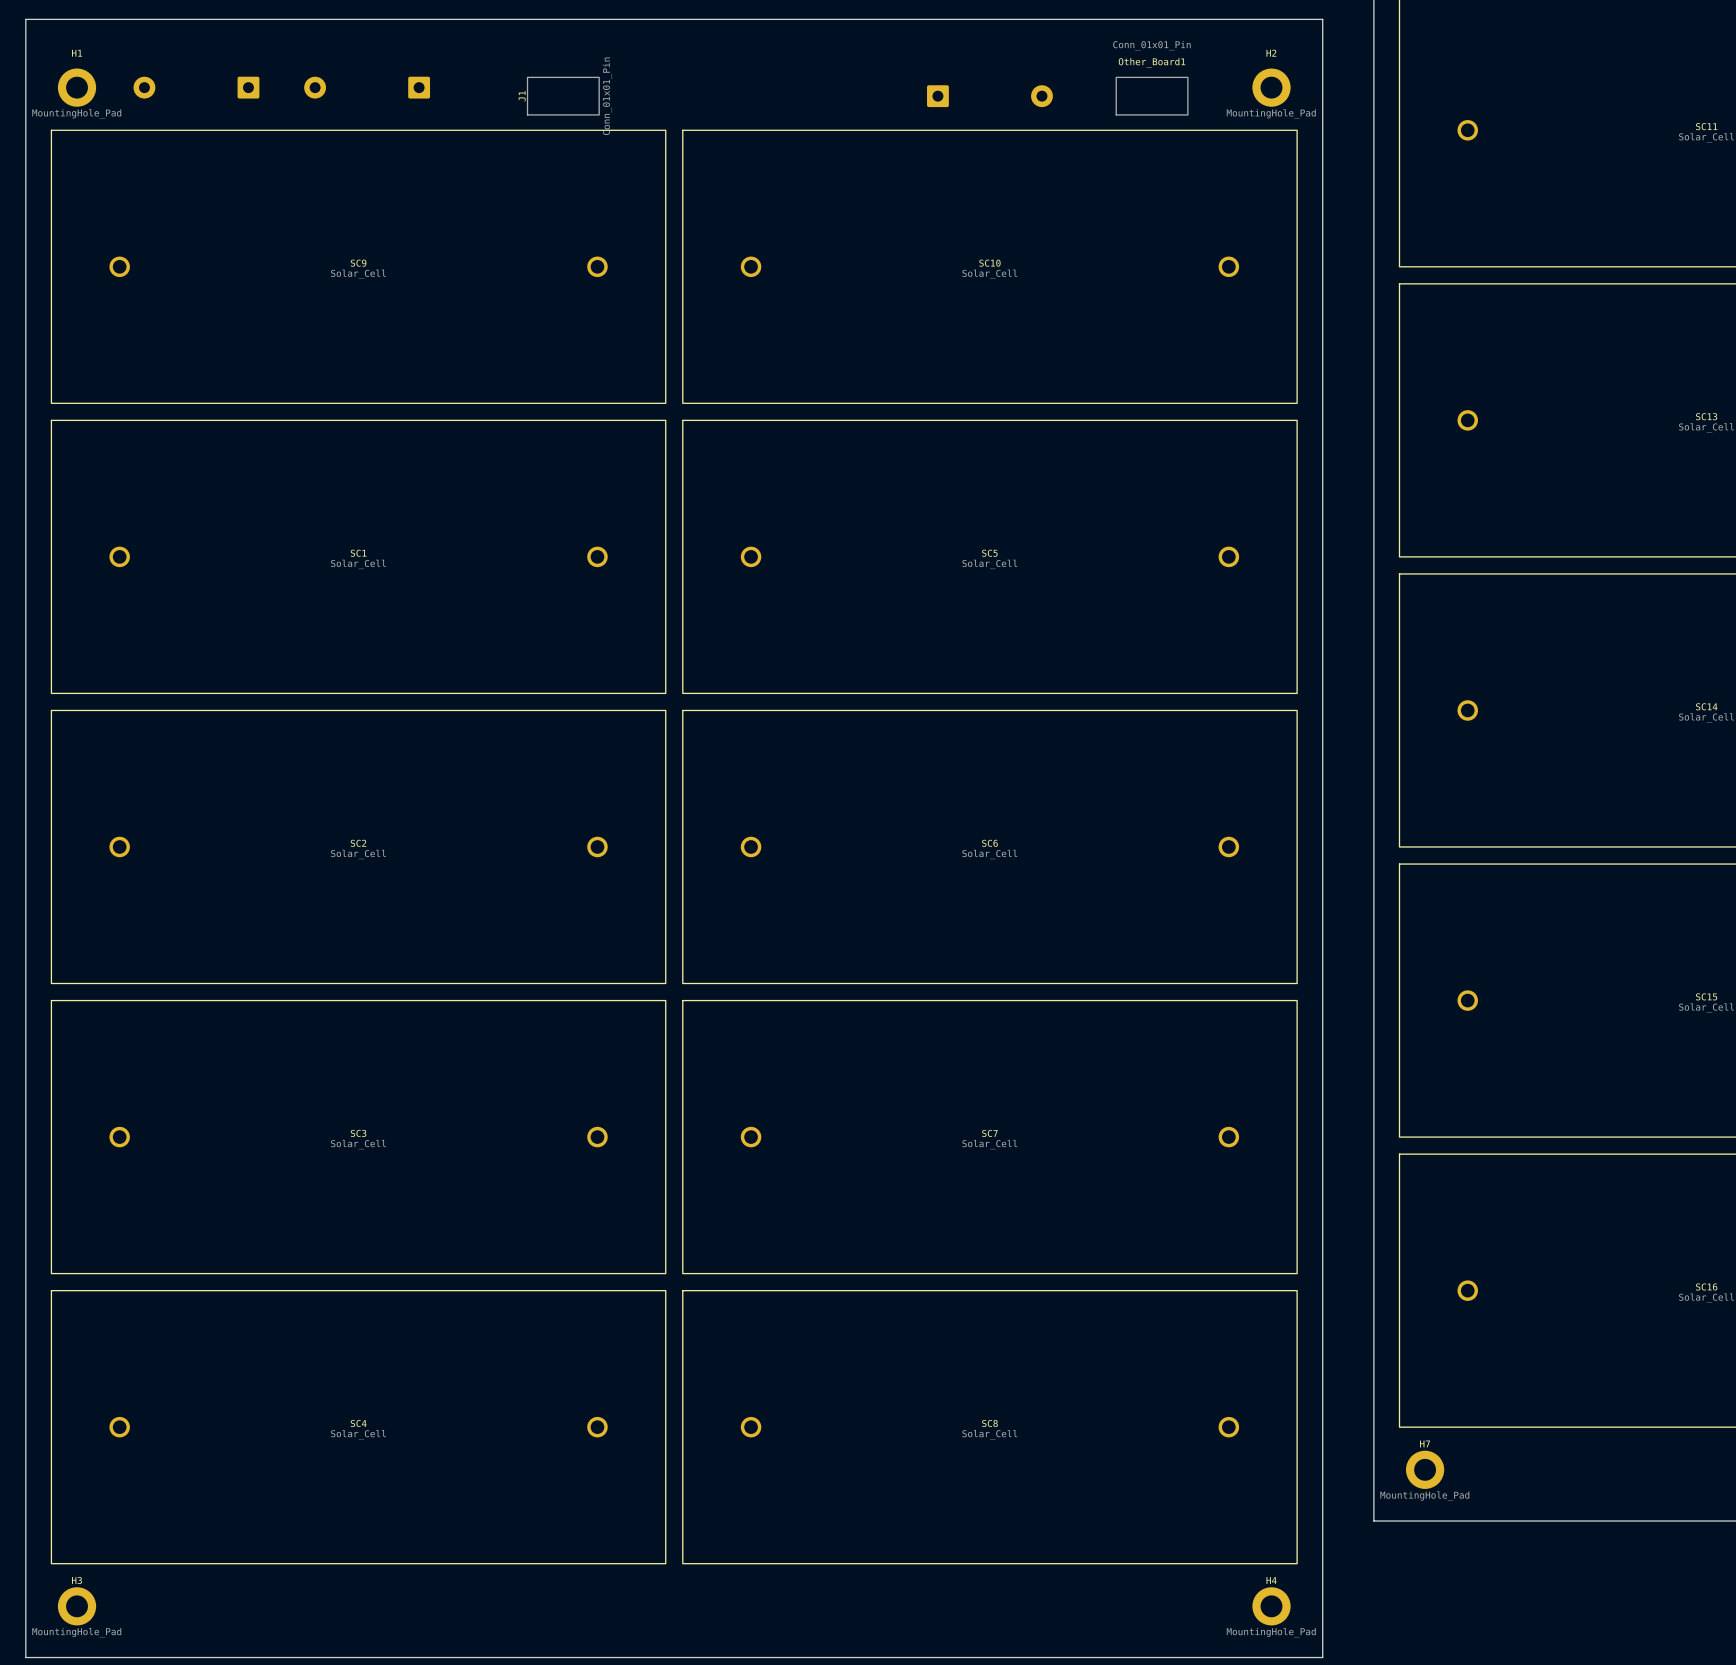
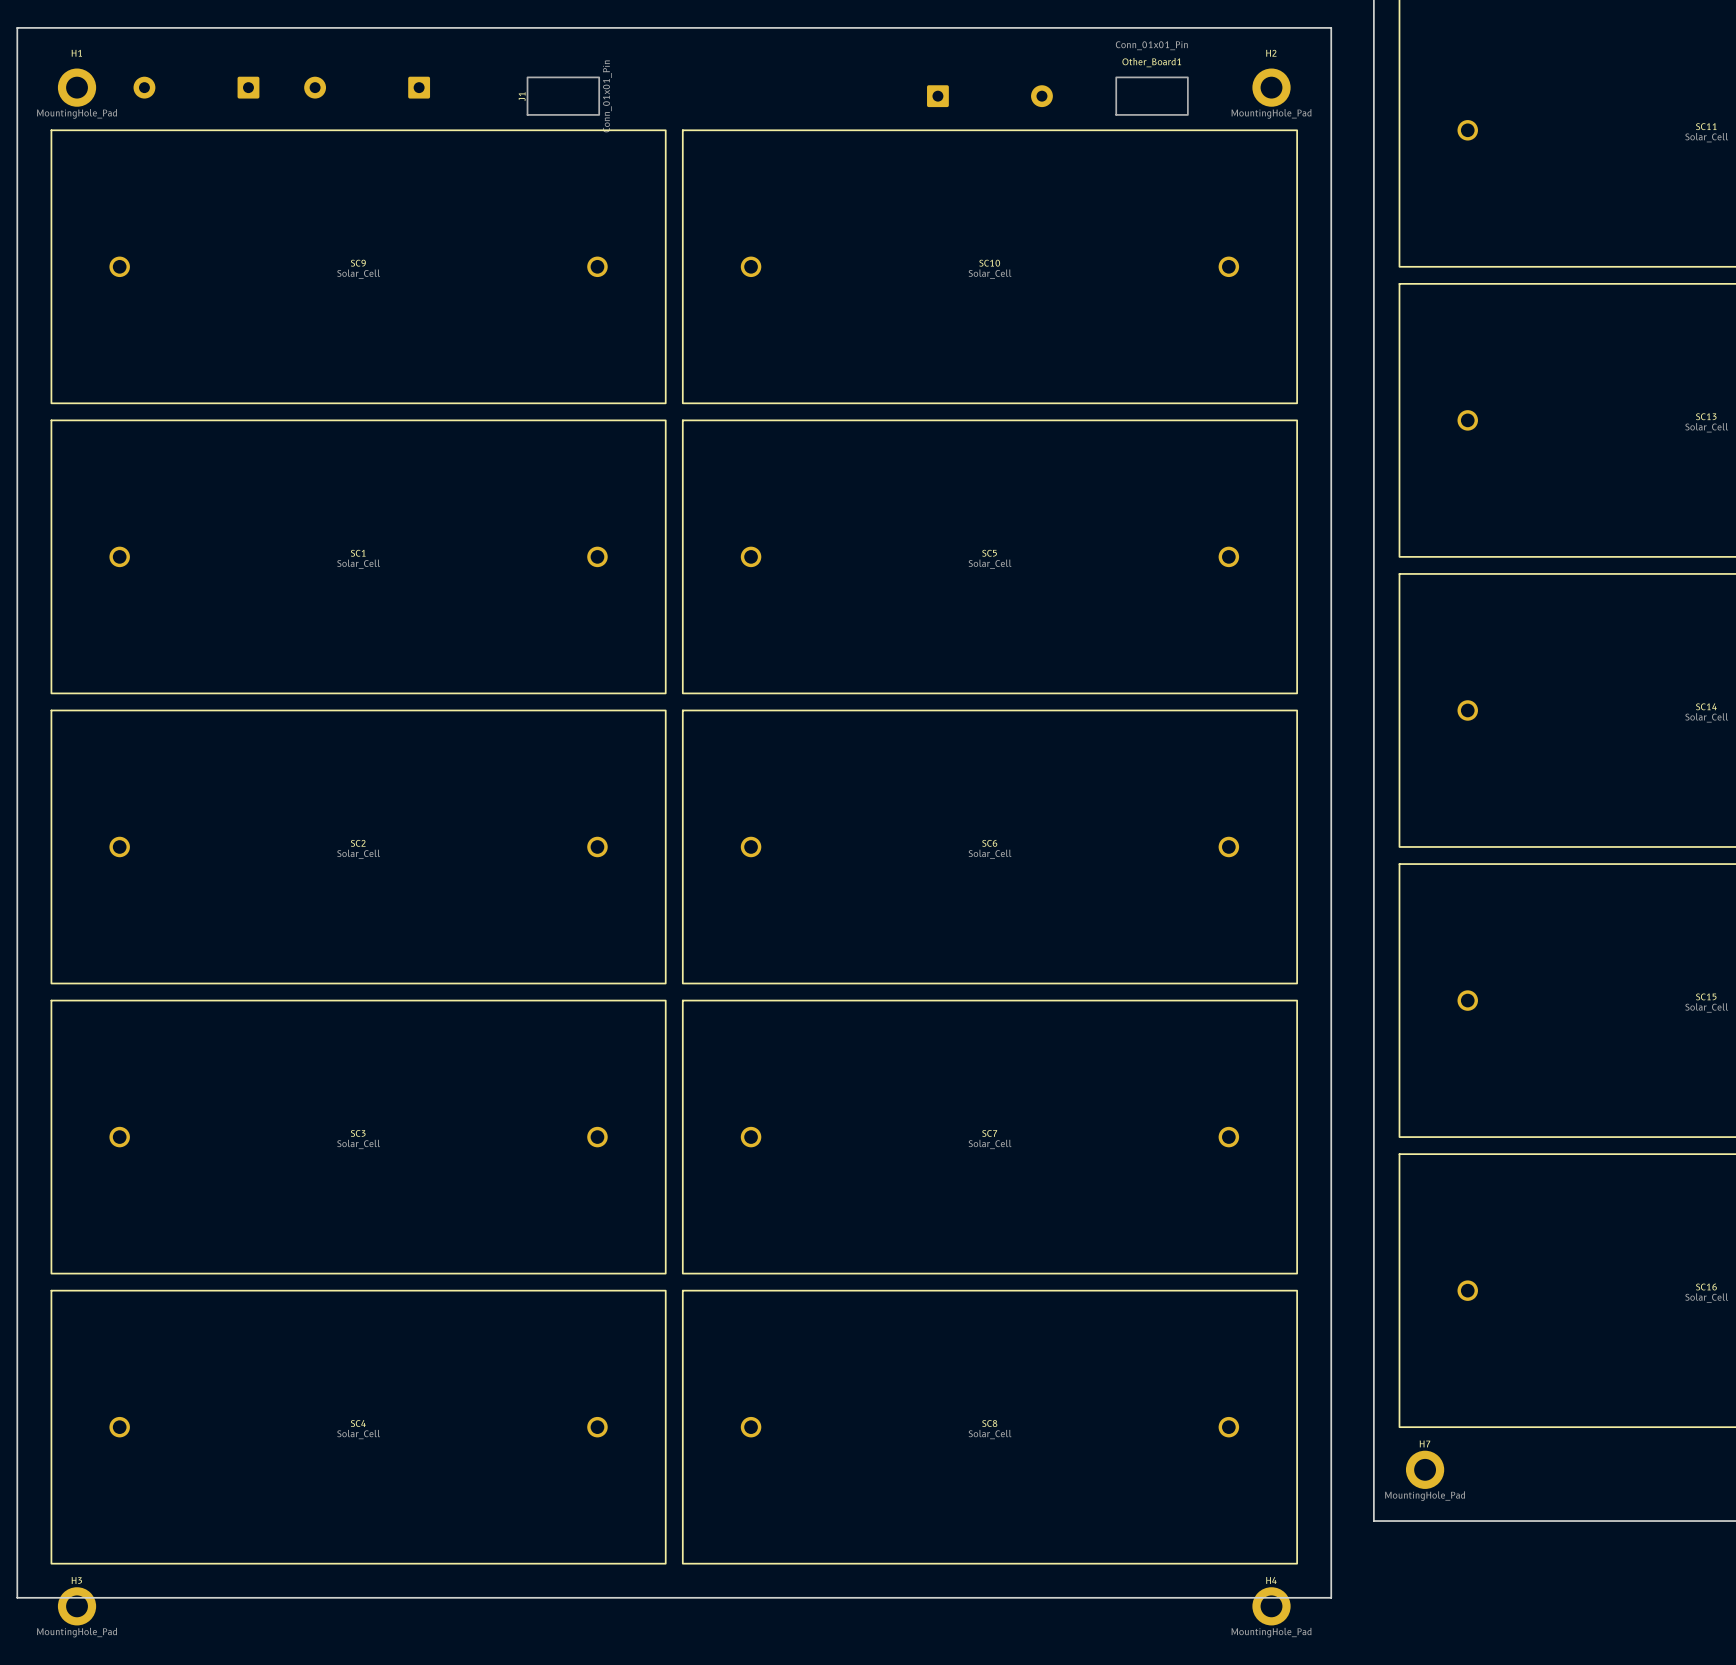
board edge: (25, 19) (1322, 19) (1322, 1657) (25, 1657) (25, 19) -> (17, 27) (17, 1597) (1331, 1597) (1331, 27) (17, 27)

